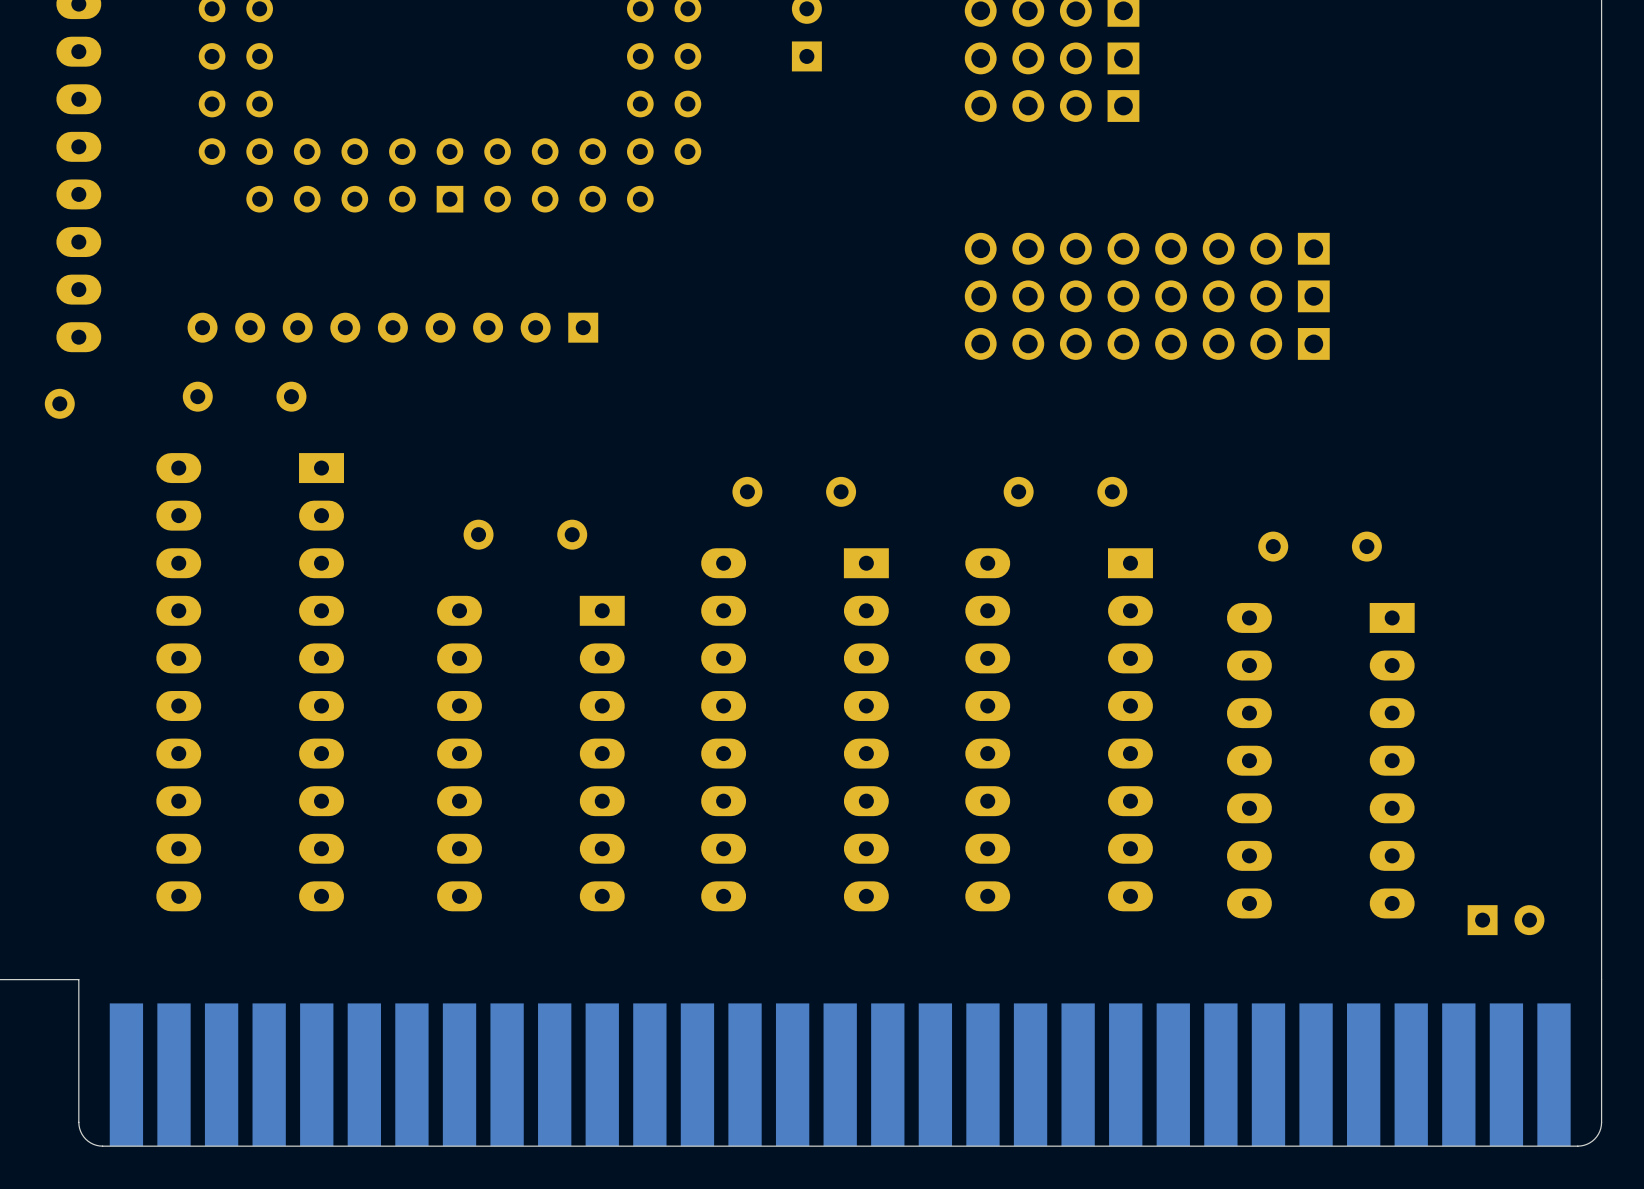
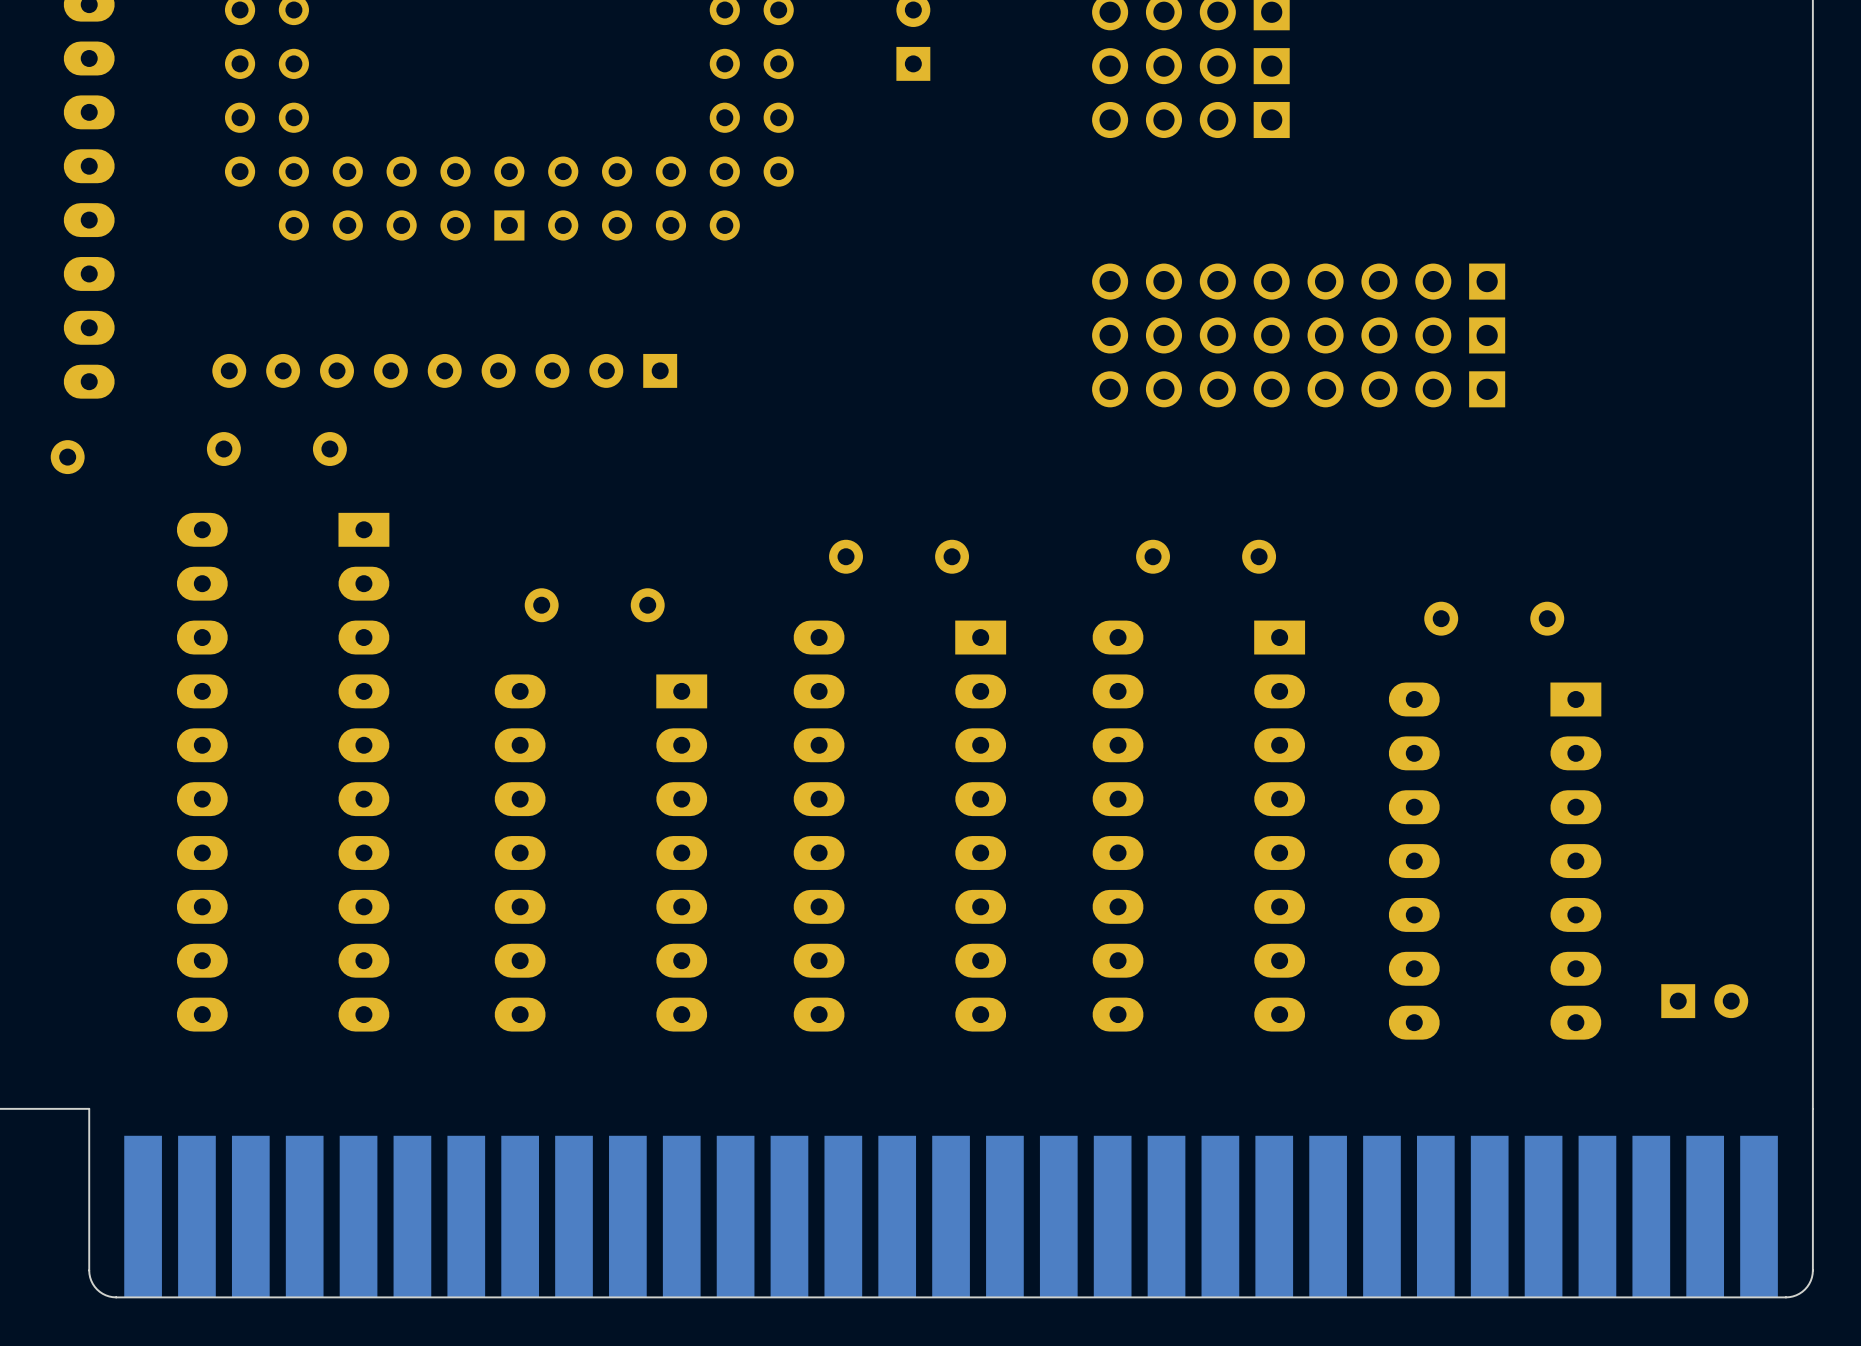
part position: (1506, 920) -> (1704, 1001)

